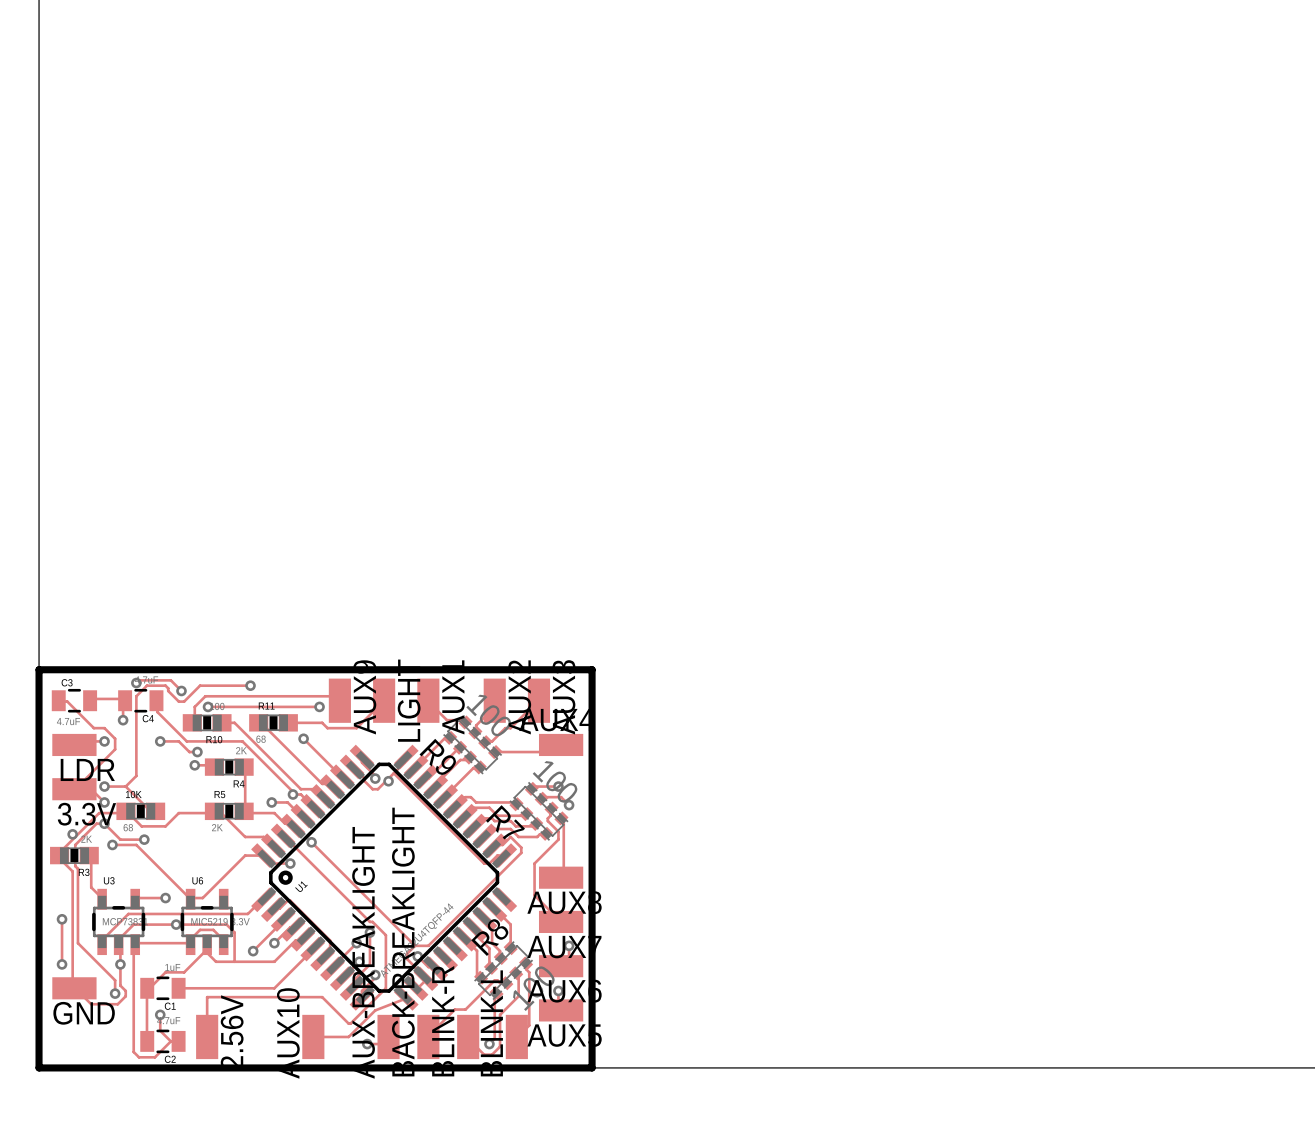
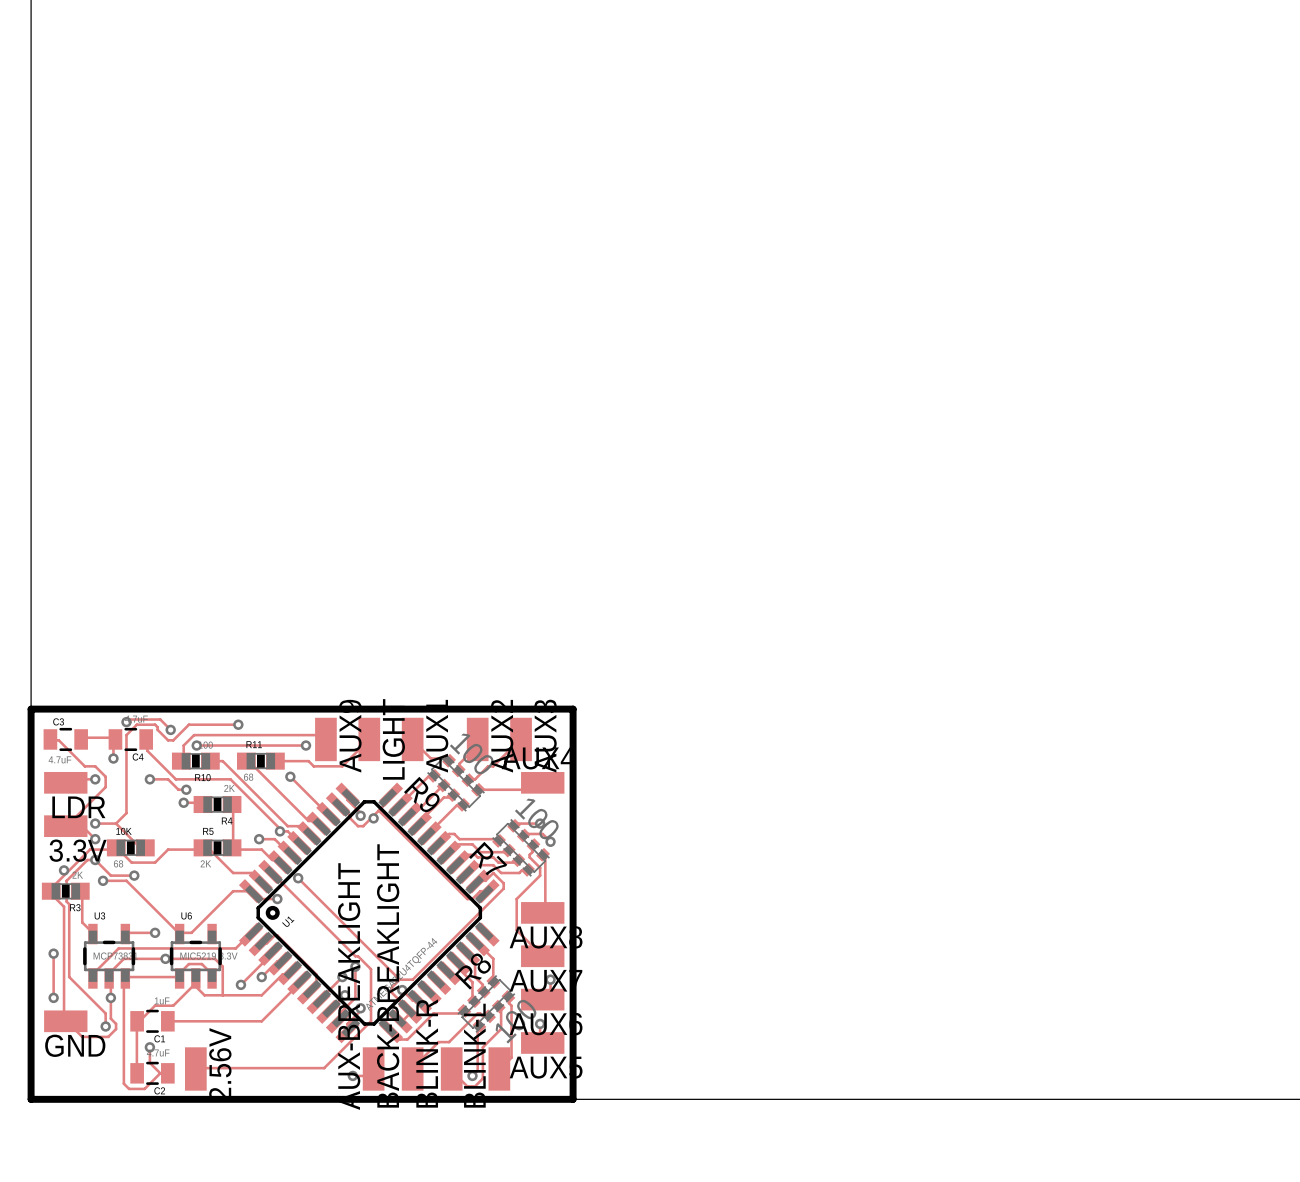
track: (465, 939) (477, 950) (477, 977) (481, 977) -> (391, 1031) (399, 1039) (407, 1039) (433, 1013) (462, 1013) (464, 1010)
track: (406, 998) (375, 1010) (348, 1036) (313, 1036) -> none
track: (350, 1023) (322, 997) (207, 997) (208, 1036) -> (336, 1055) (324, 1068) (196, 1068)
AUX10: (313, 1036) -> none

